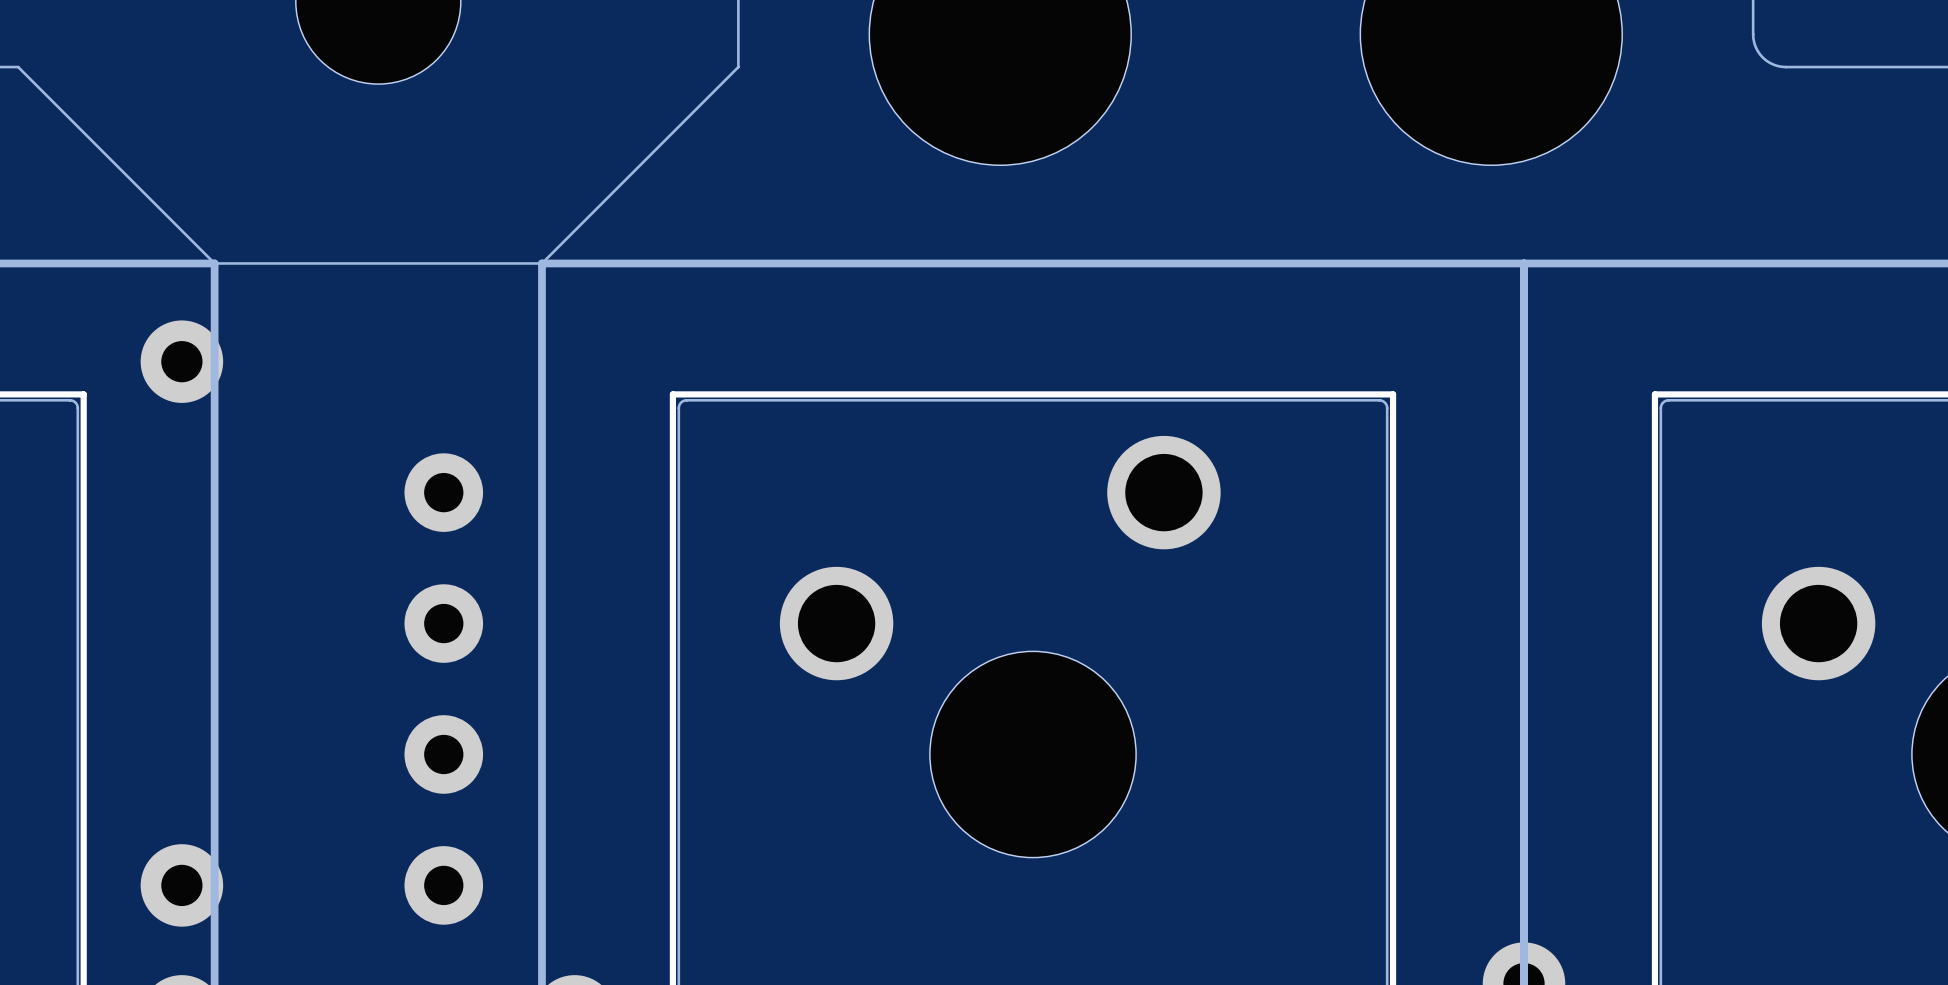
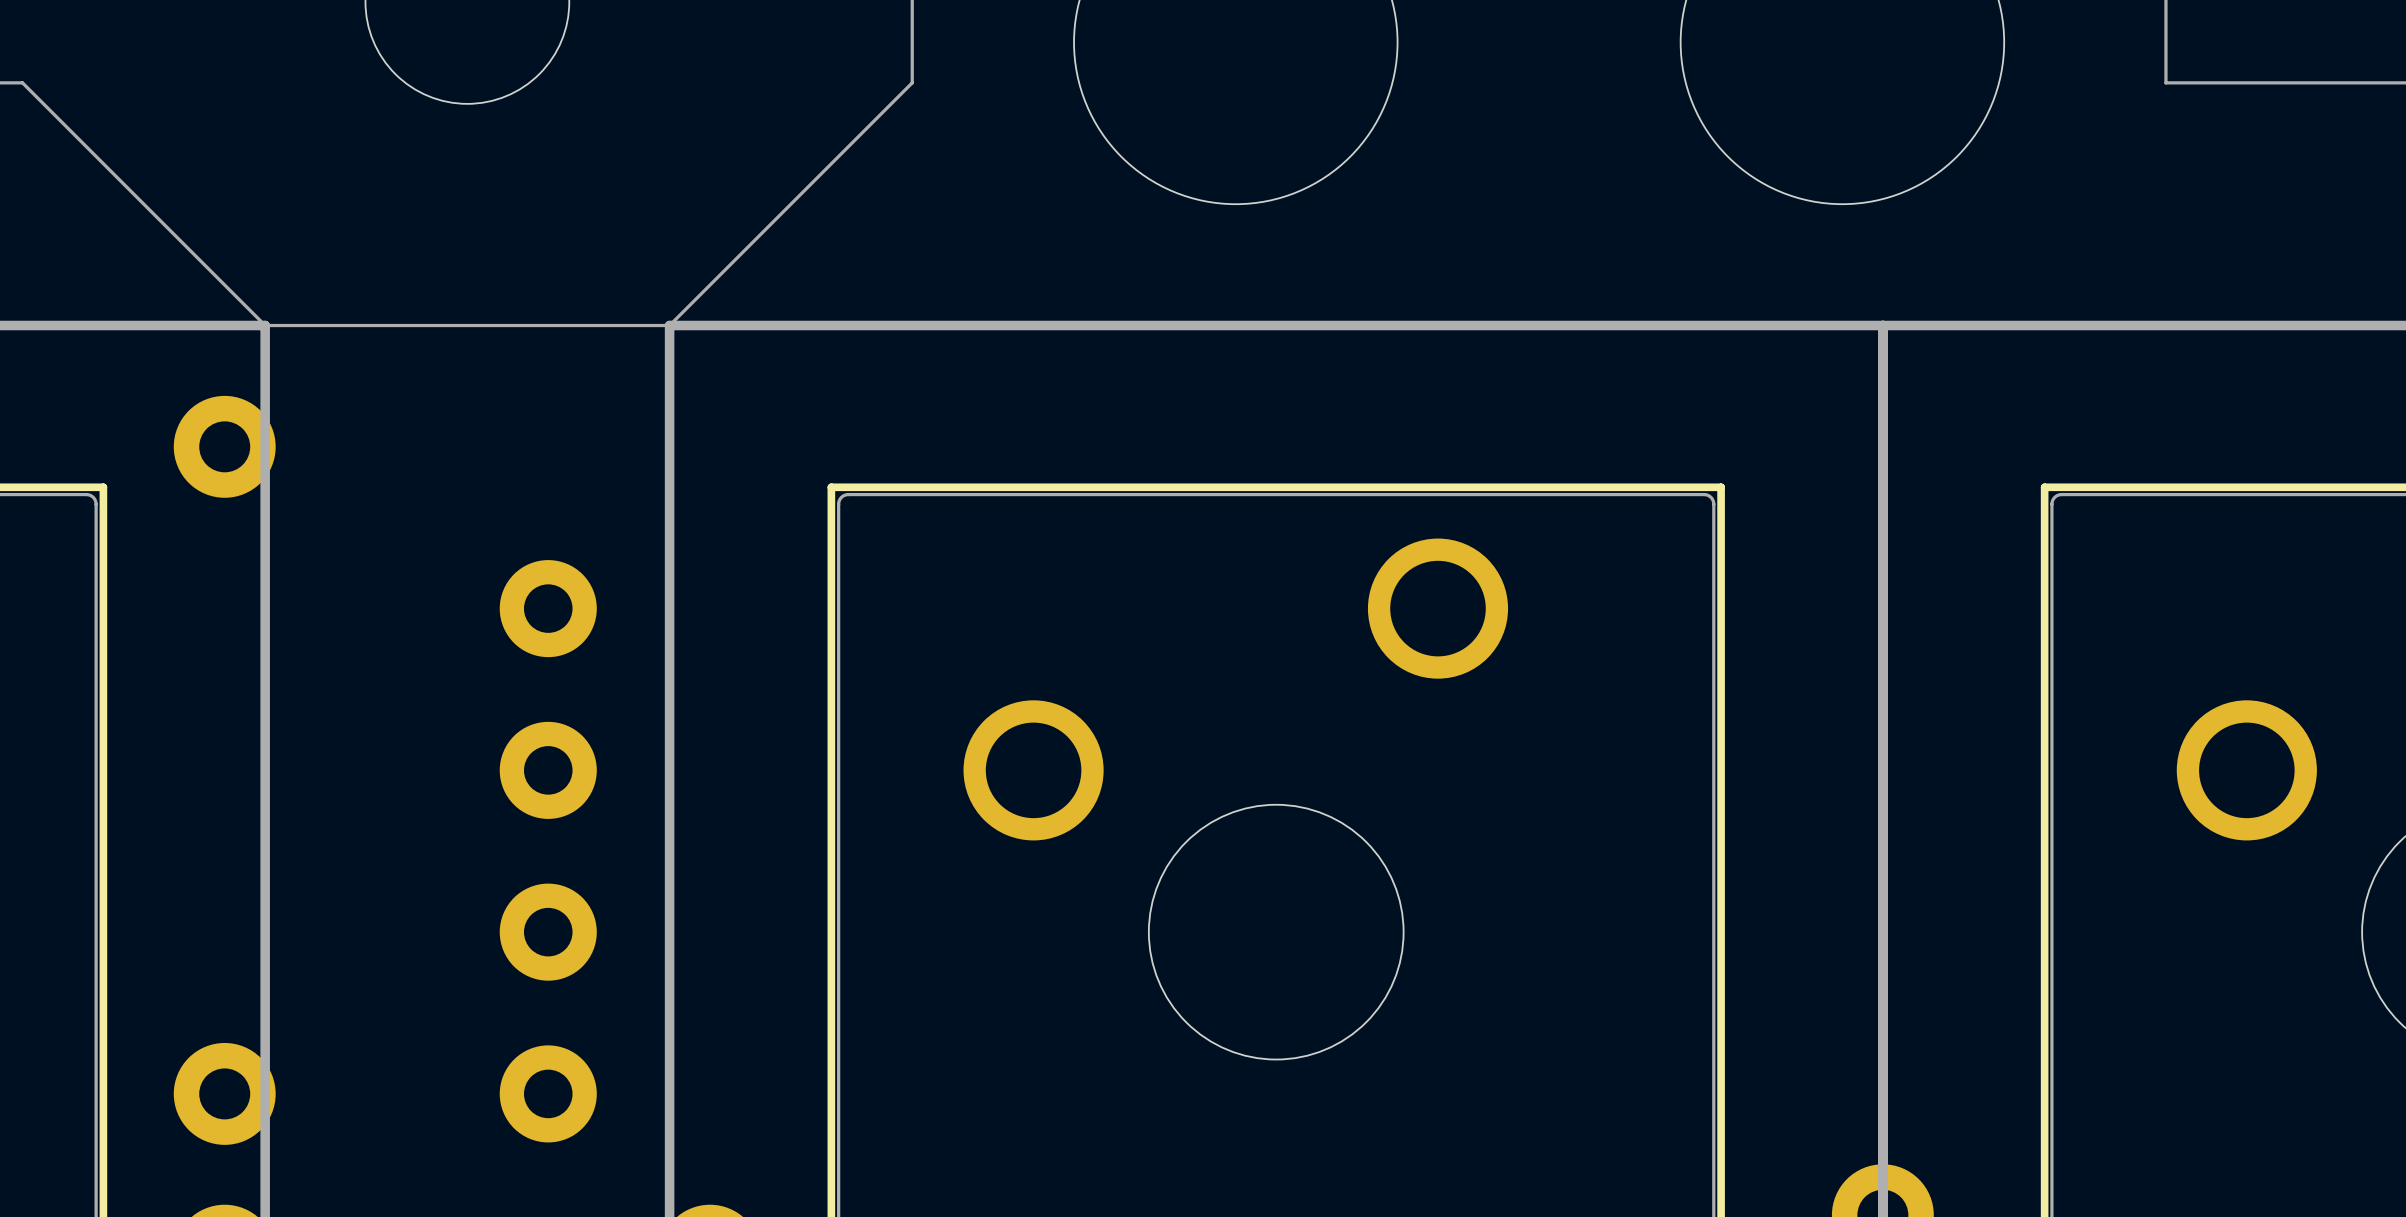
line: (1753, 34) (1755, 46) (1762, 57) (1773, 64) (1785, 67) -> (2165, 42) (2165, 82) (2206, 82)

